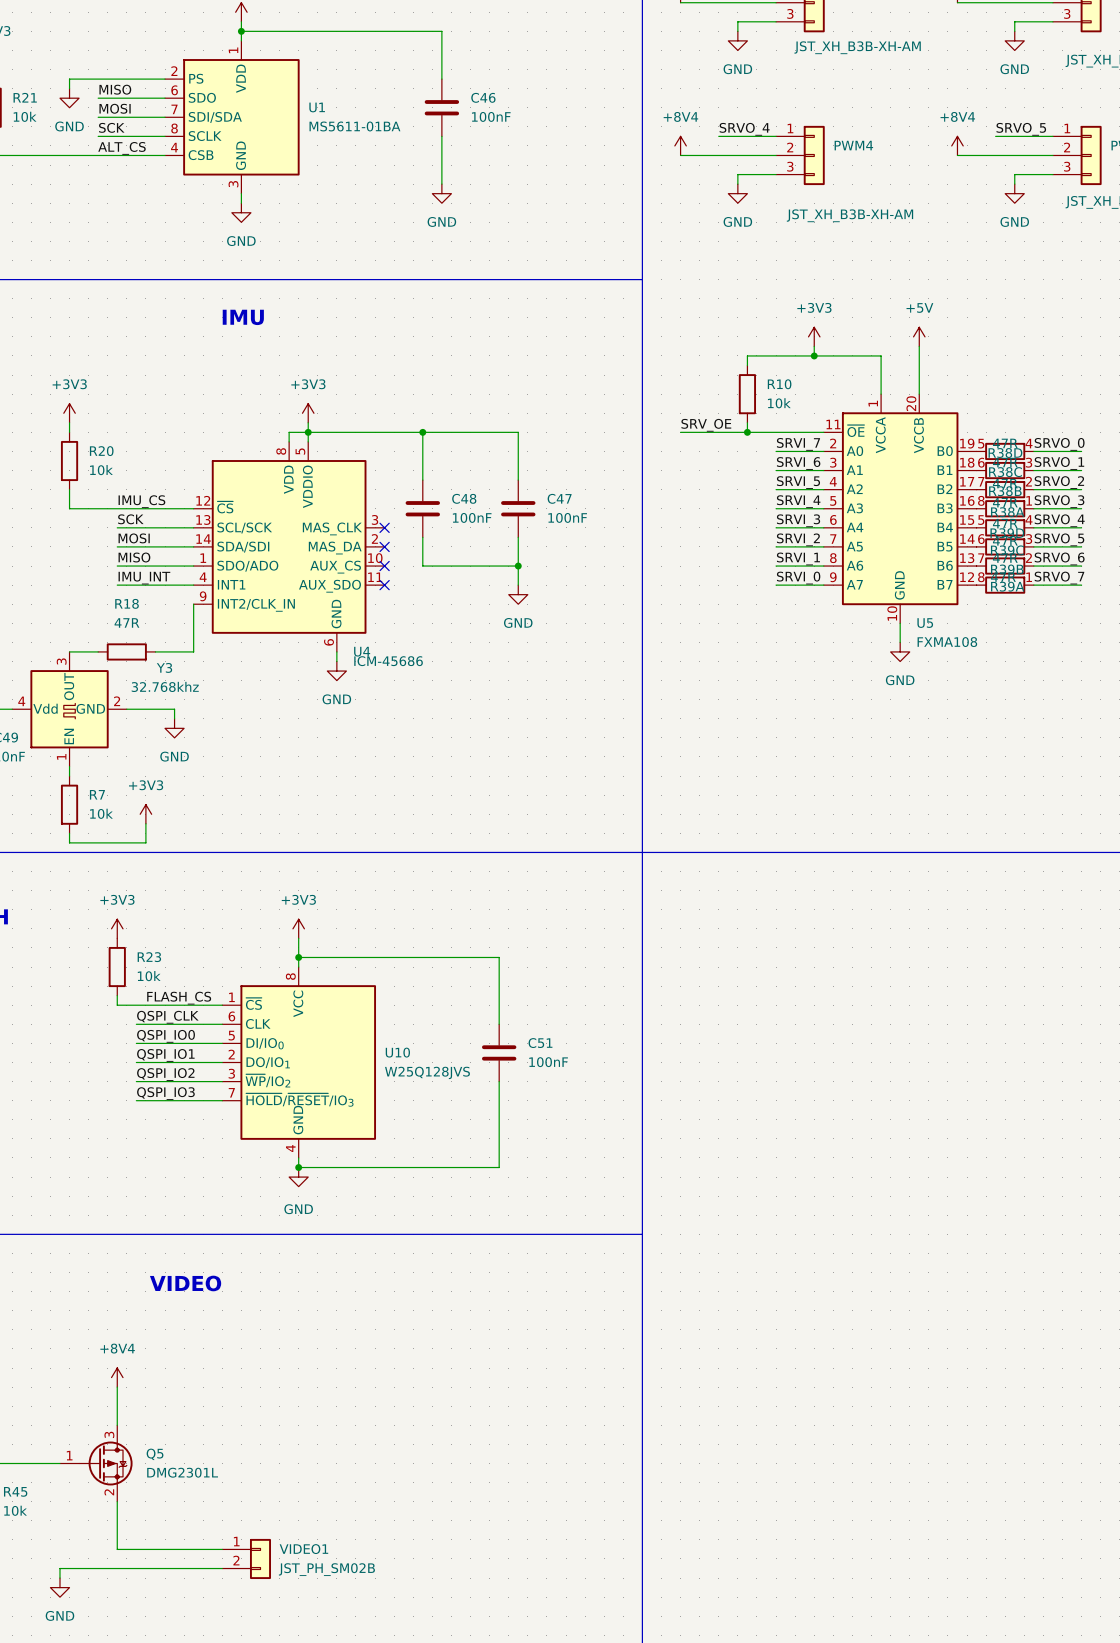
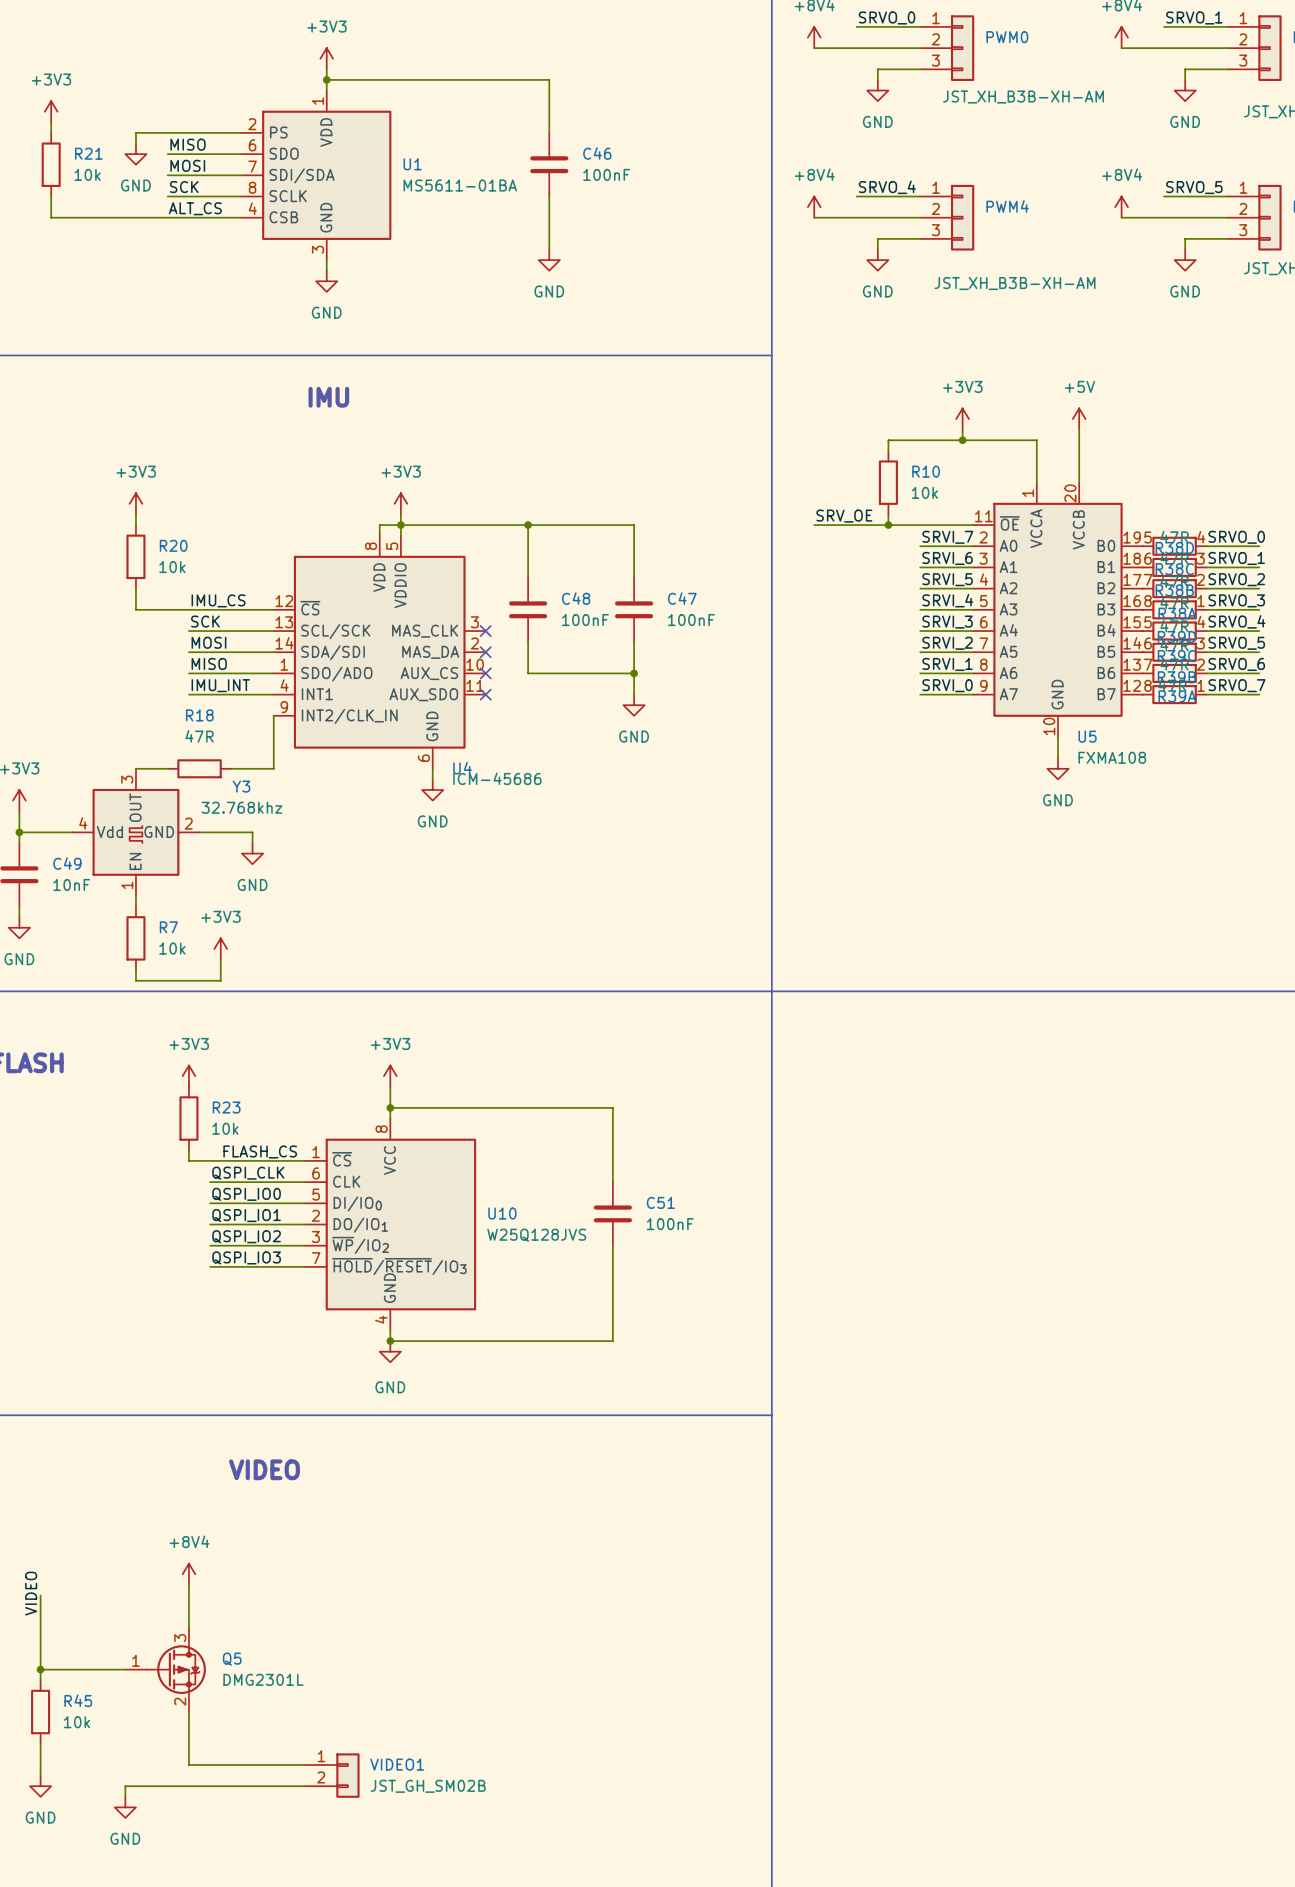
VIDEO1 value: JST_PH_SM02B (326, 1569) -> JST_GH_SM02B (428, 1786)

